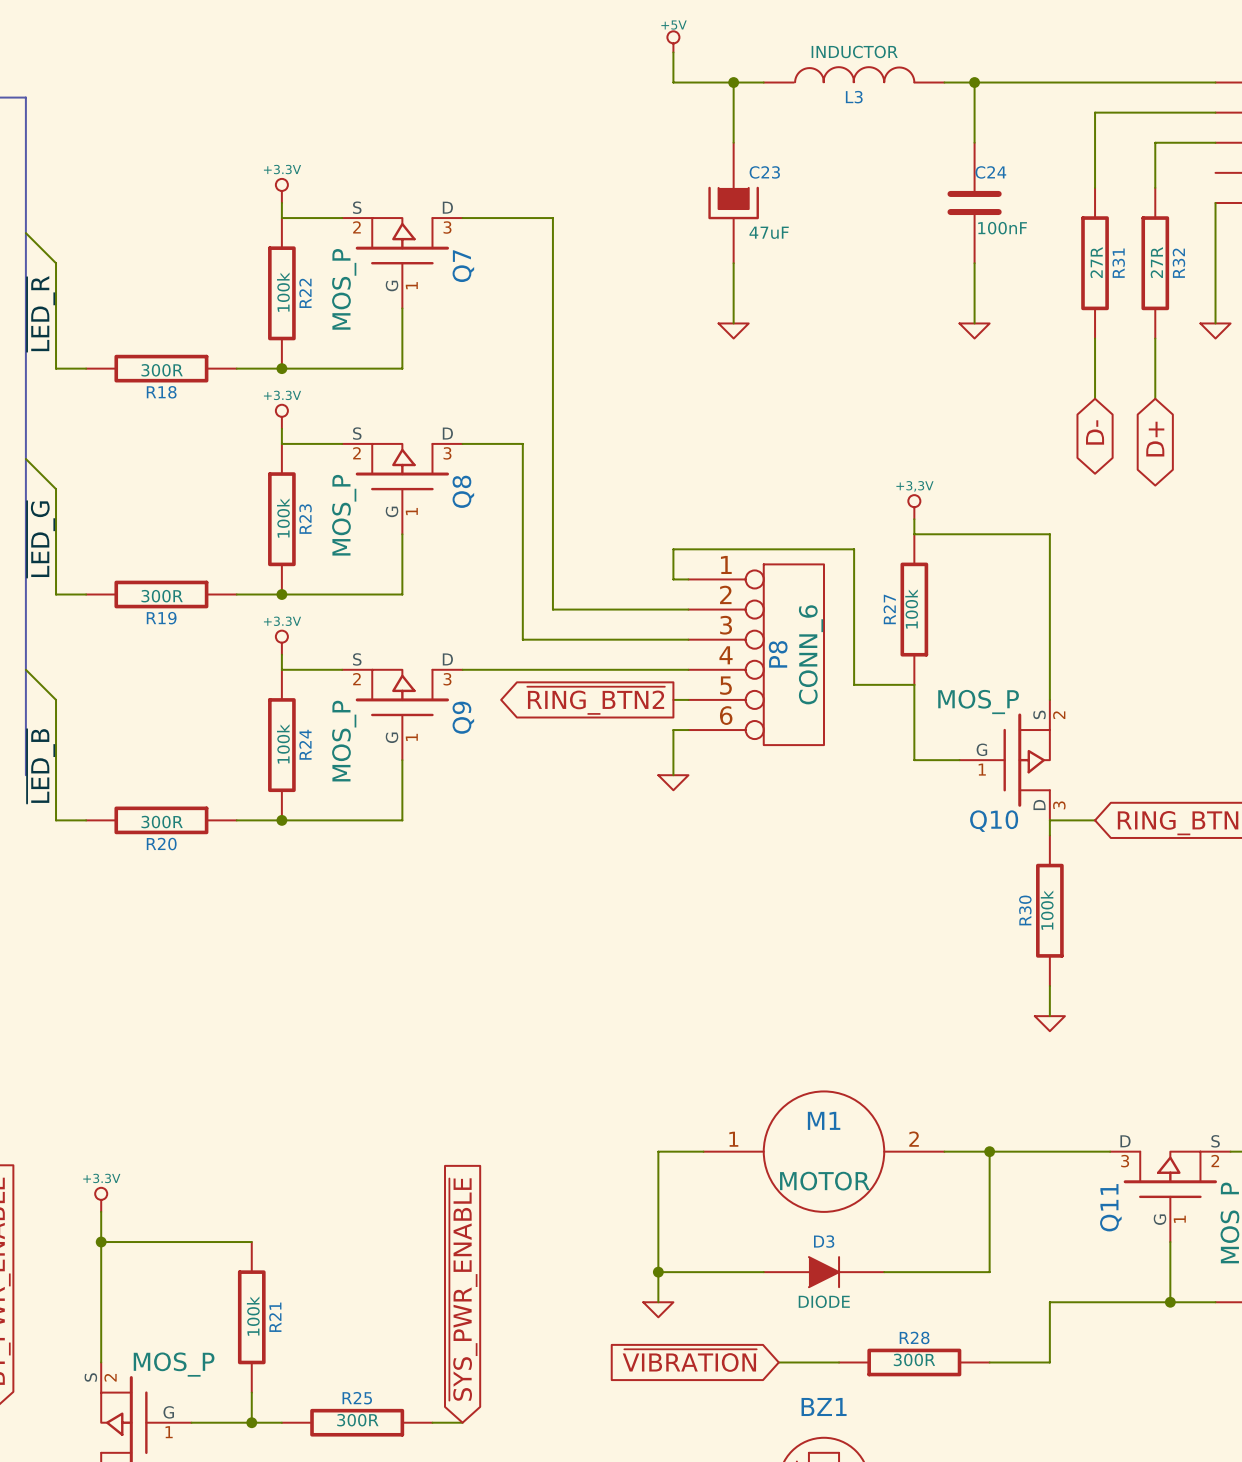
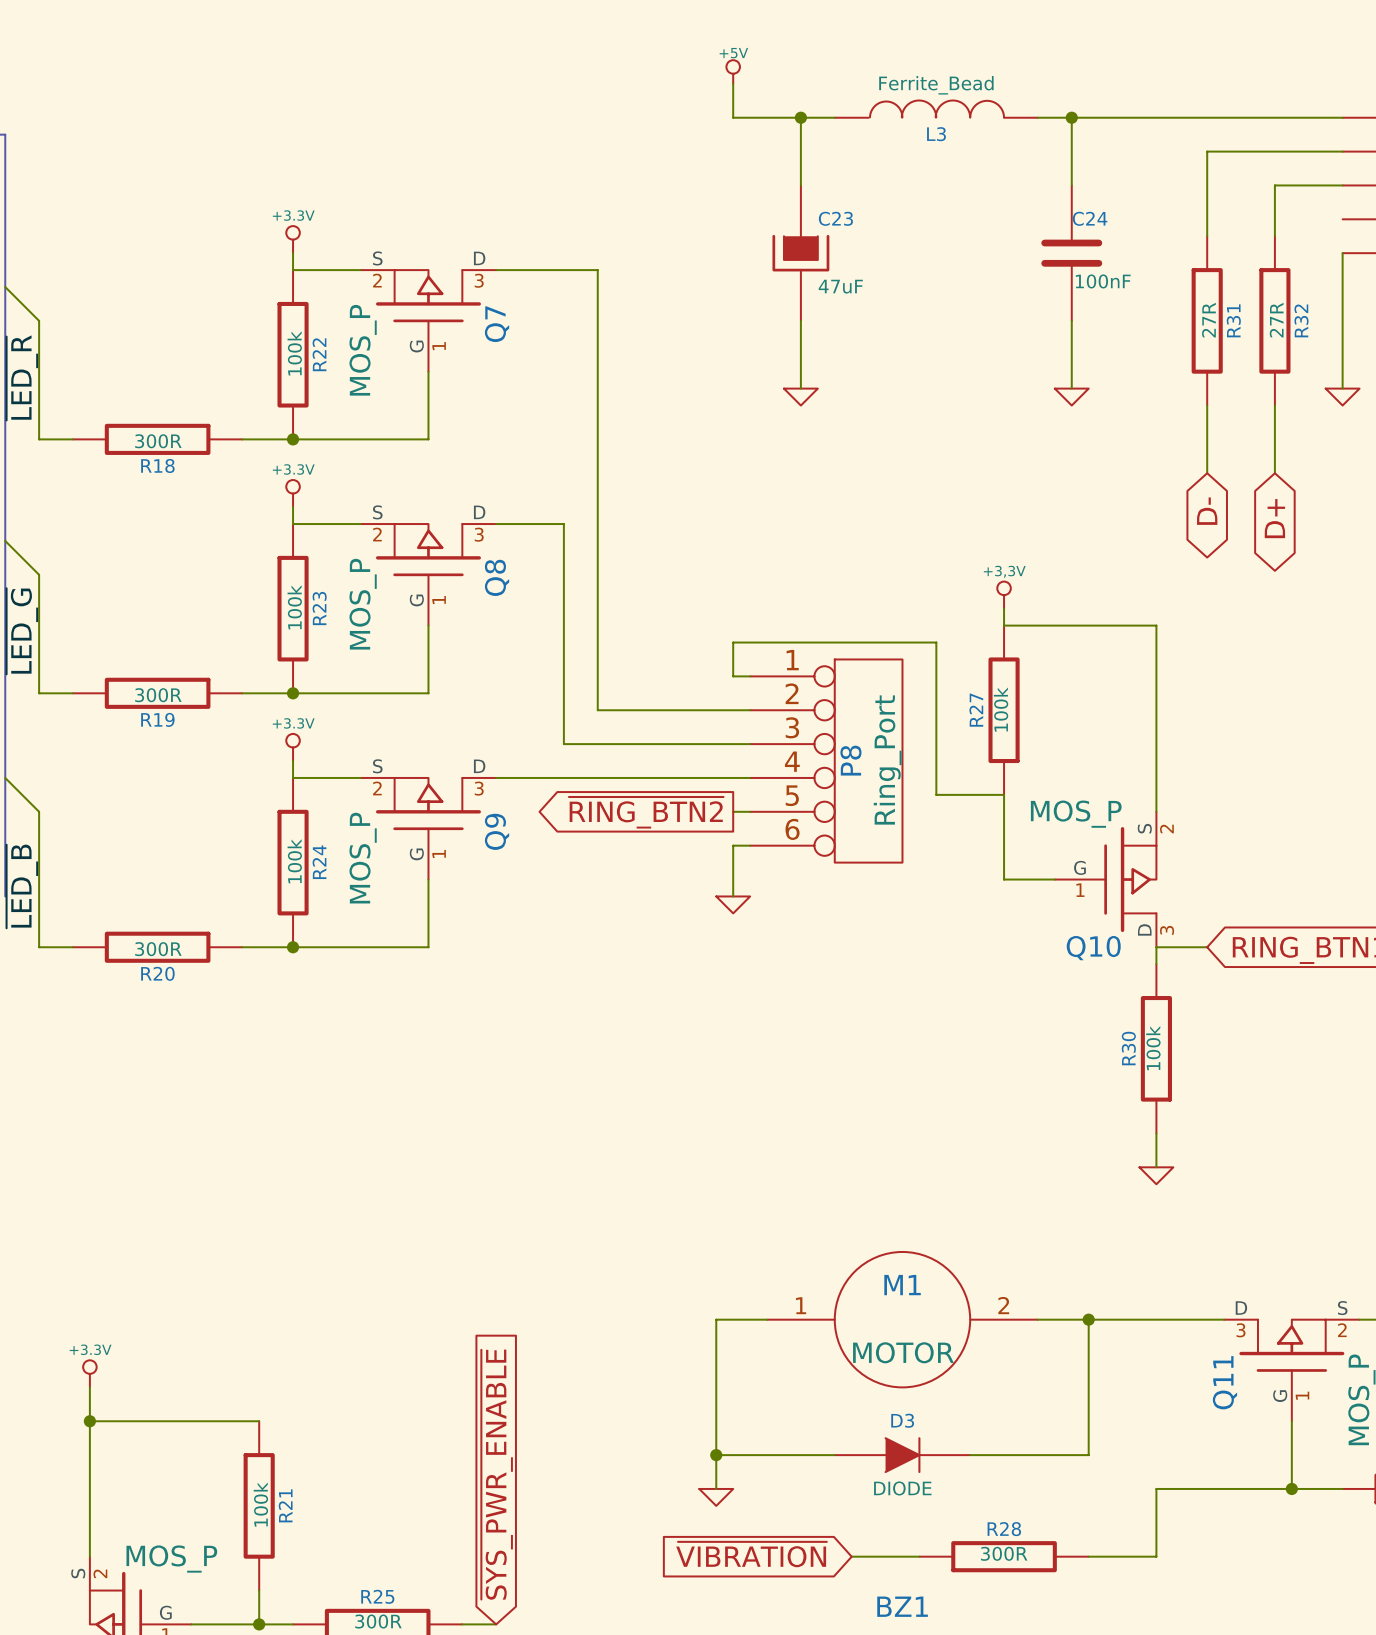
L3 value: INDUCTOR (854, 51) -> Ferrite_Bead (936, 85)
P8 value: CONN_6 (811, 654) -> Ring_Port (887, 760)

